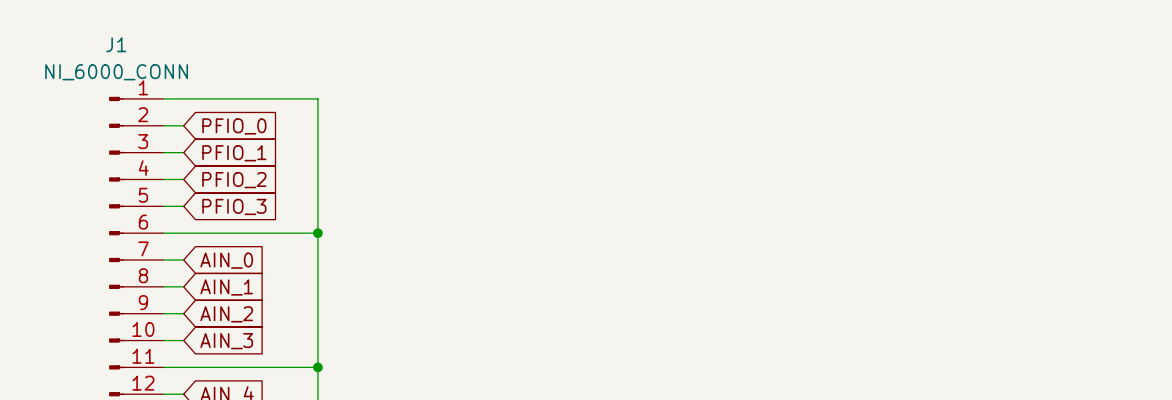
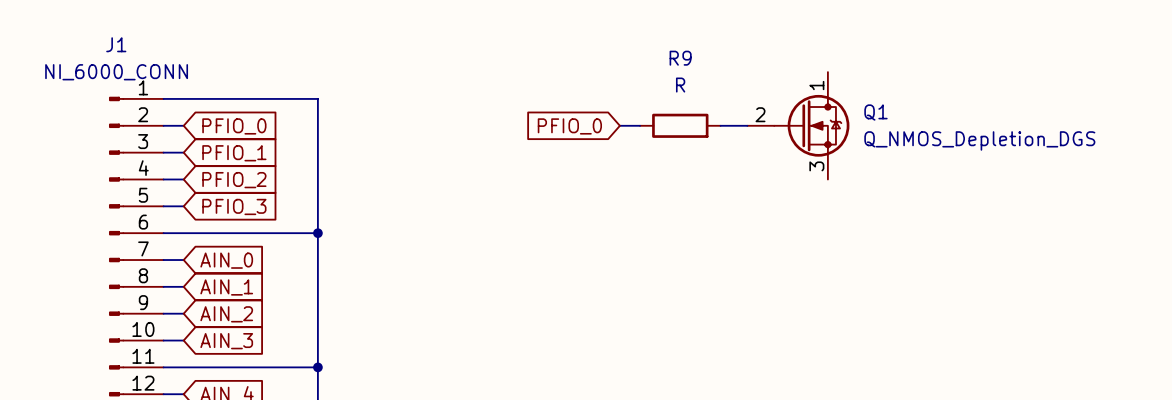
wire: none -> (619, 125) (640, 125)
R9: none -> R (680, 125)
wire: none -> (720, 125) (747, 125)
Q1: none -> Q_NMOS_Depletion_DGS (798, 125)
global label: none -> PFIO_0 (569, 126)

